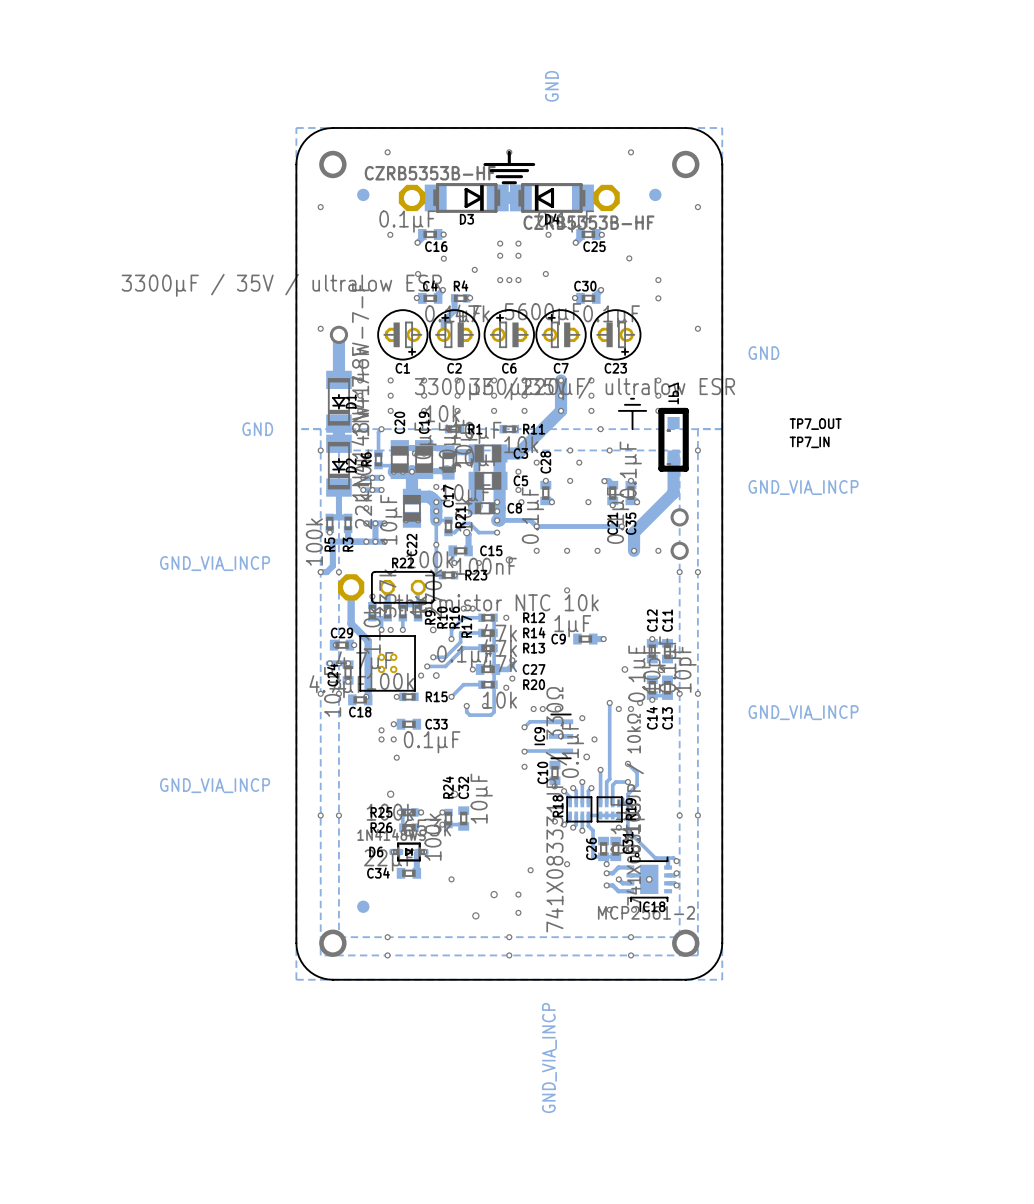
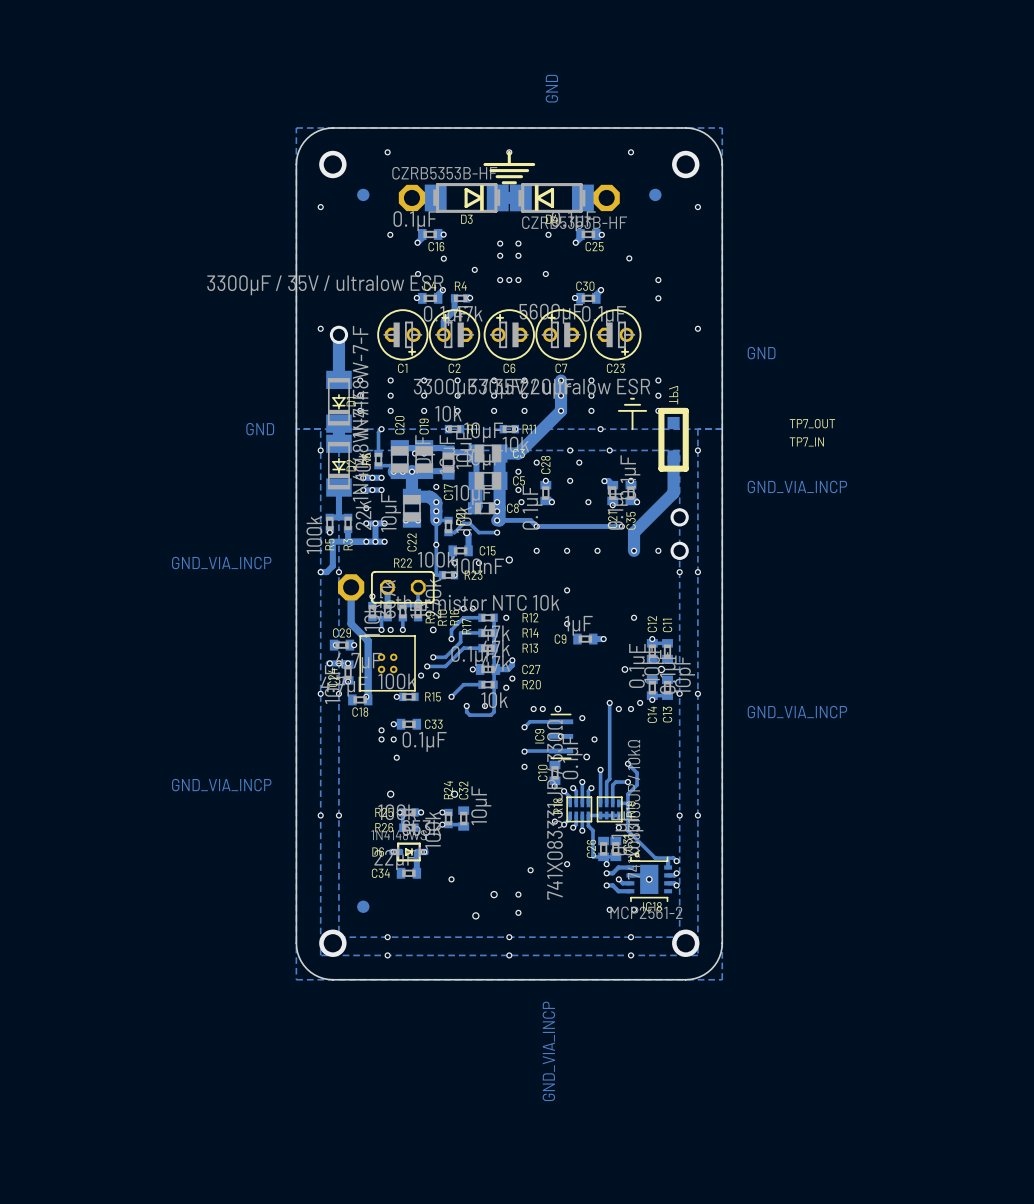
via: none -> (634, 617)
via: none -> (567, 623)

